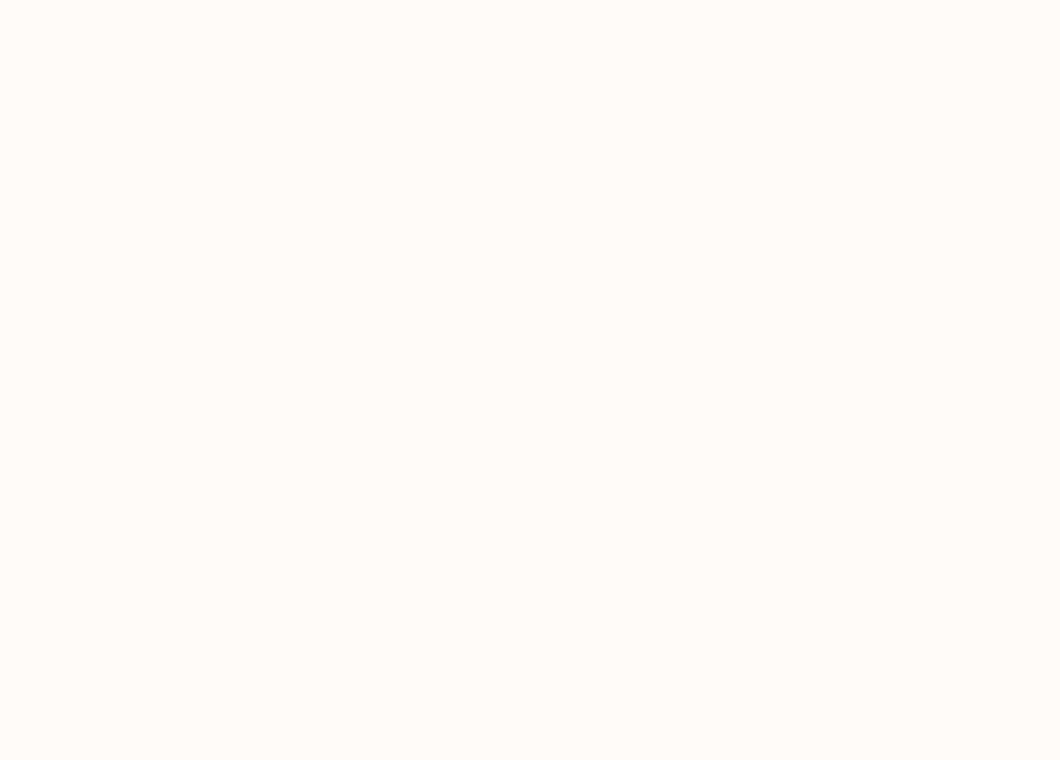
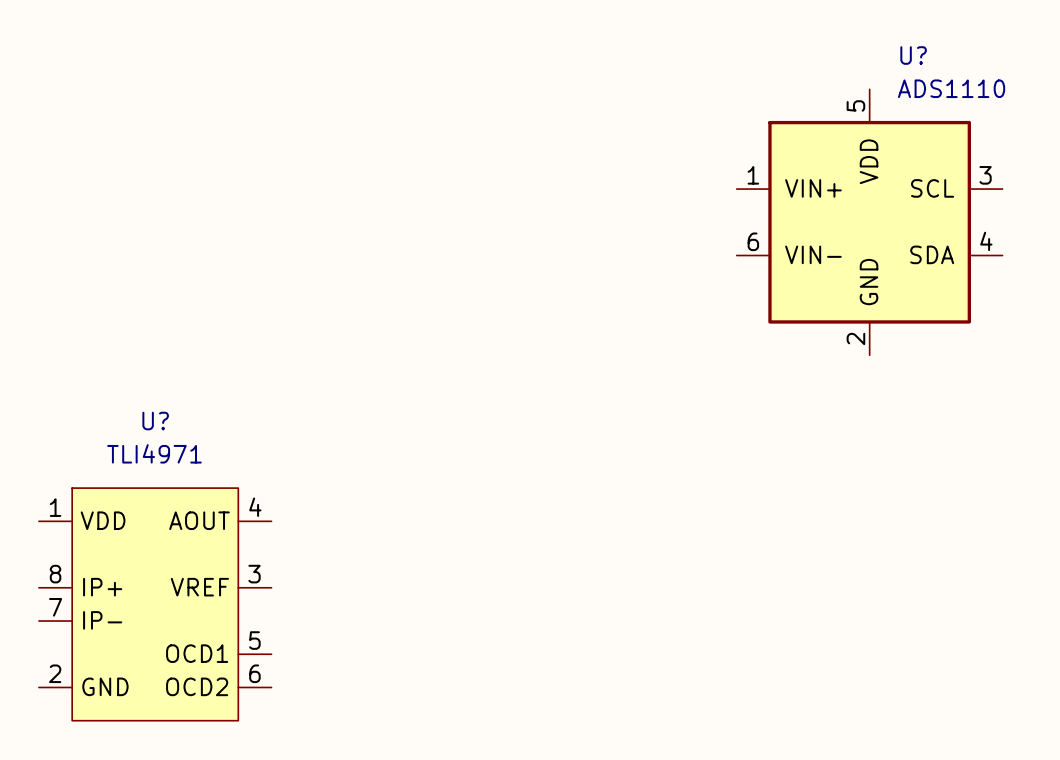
U?: none -> ADS1110 (869, 222)
U?: none -> TLI4971 (155, 604)

